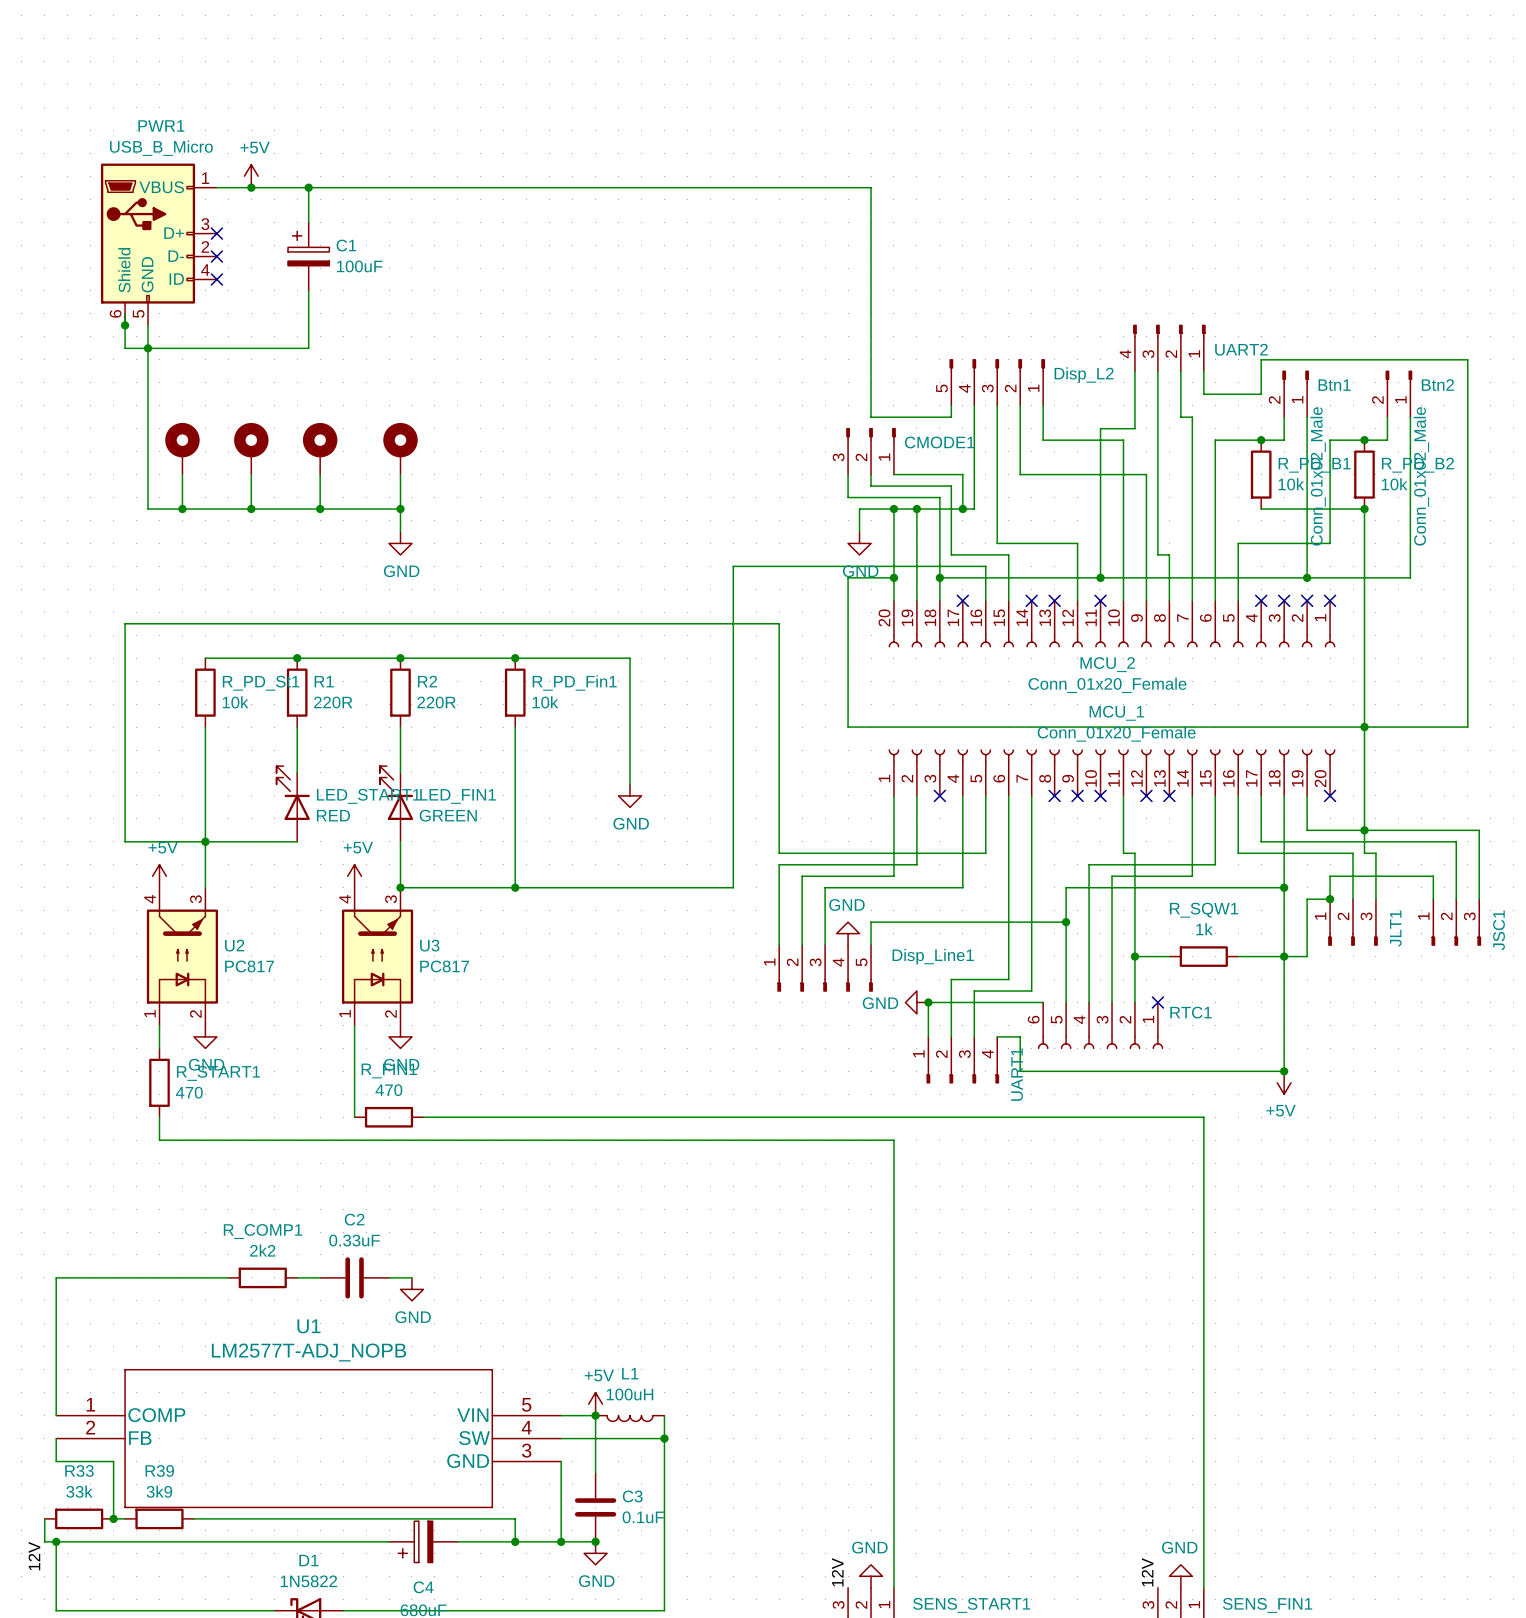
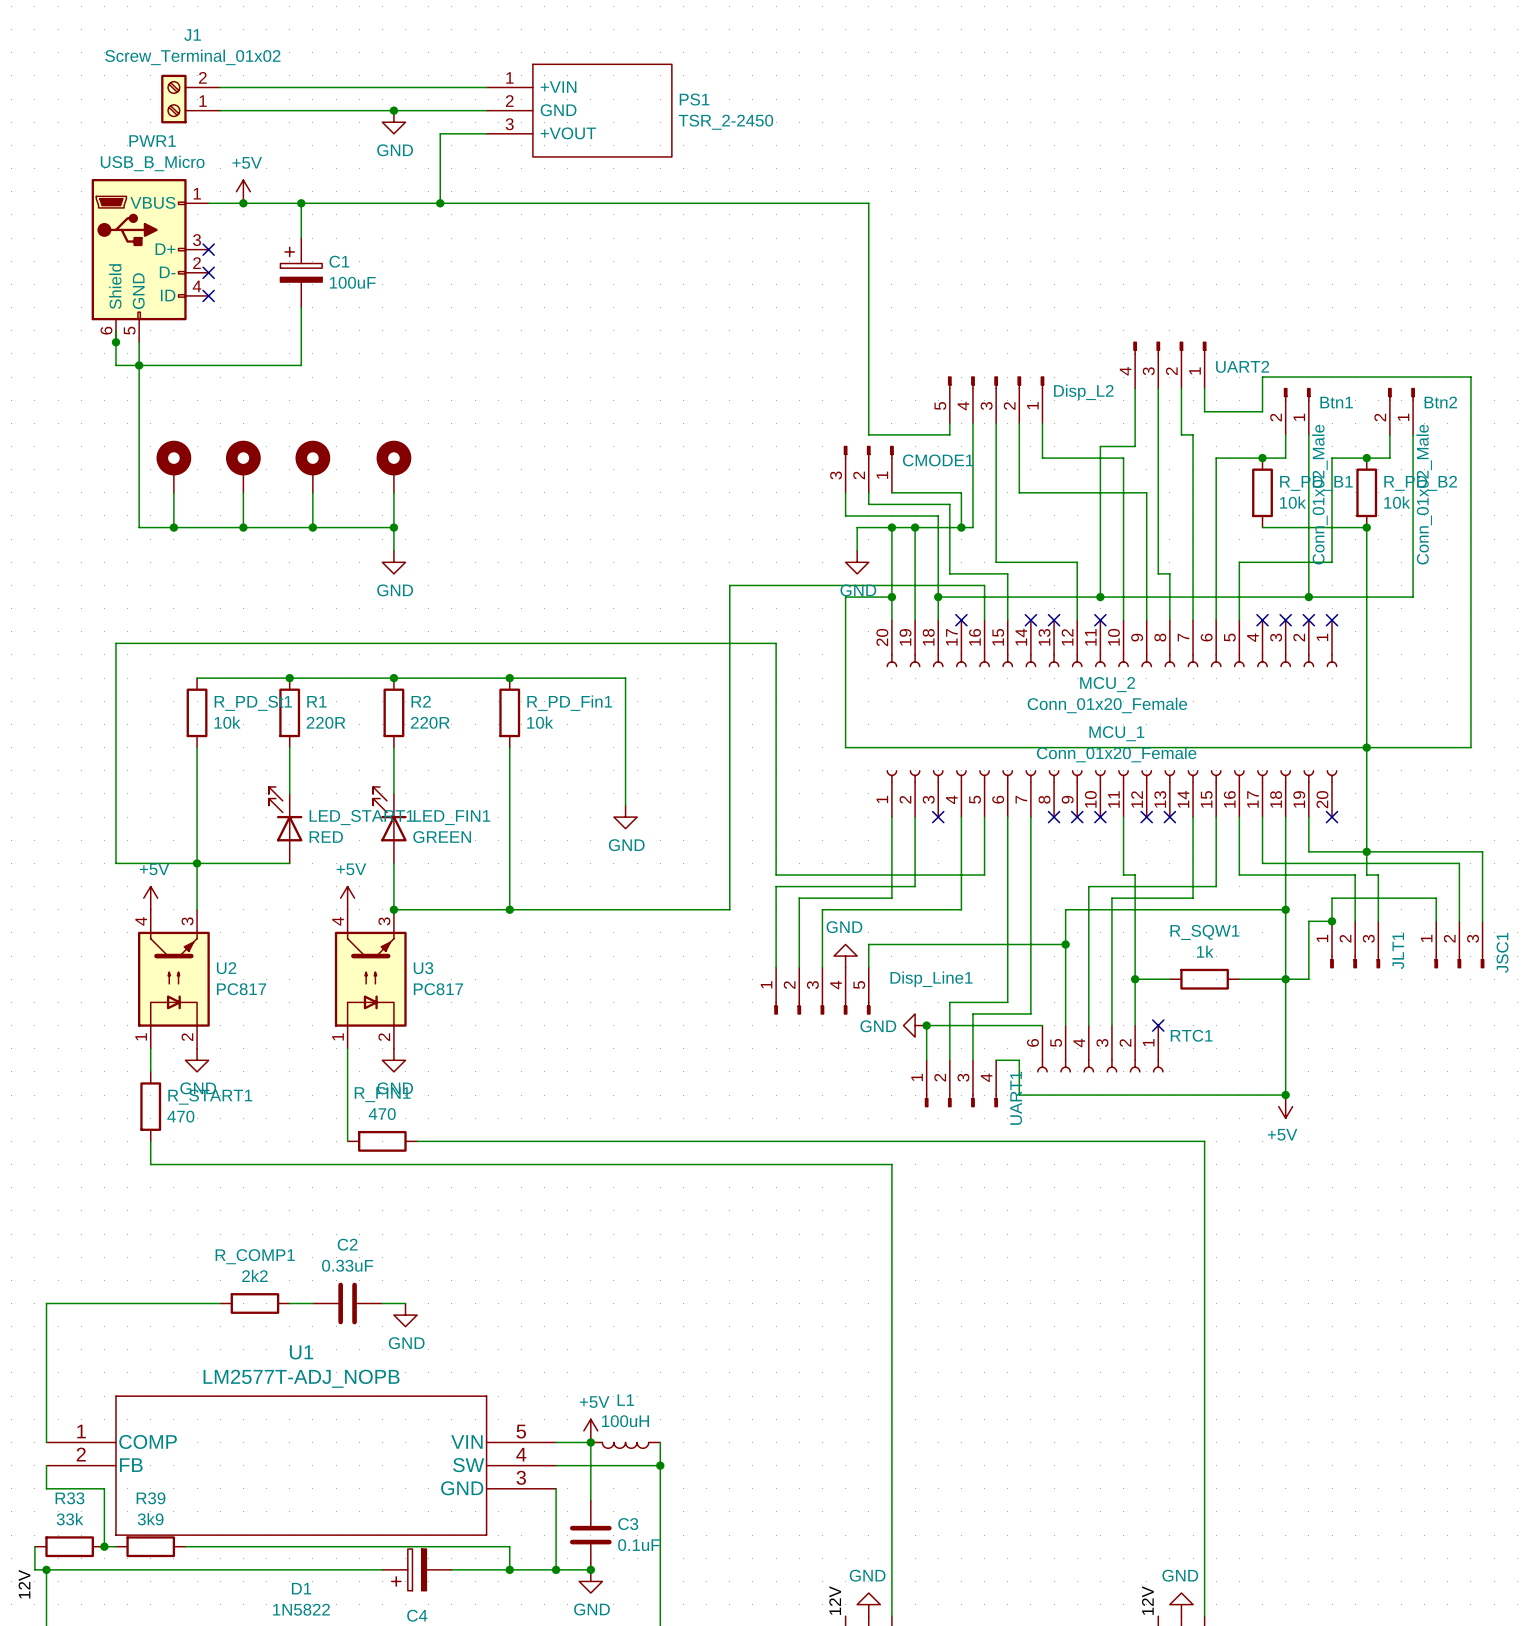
wire: none -> (220, 87) (486, 87)
J1: none -> Screw_Terminal_01x02 (190, 99)
wire: none -> (220, 110) (486, 110)
junction: none -> (393, 110)
PS1: none -> TSR_2-2450 (579, 110)
power symbol: none -> GND (393, 122)
wire: none -> (486, 133) (440, 133) (440, 203)
junction: none -> (440, 203)

